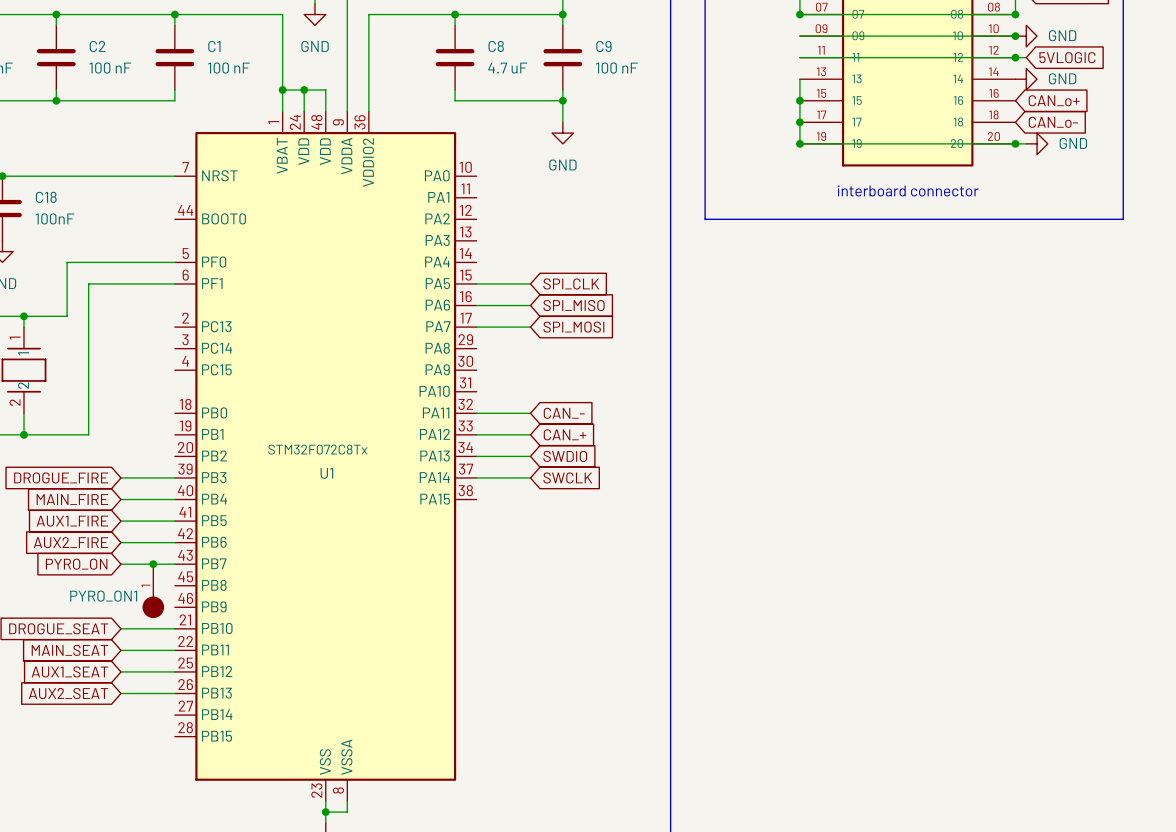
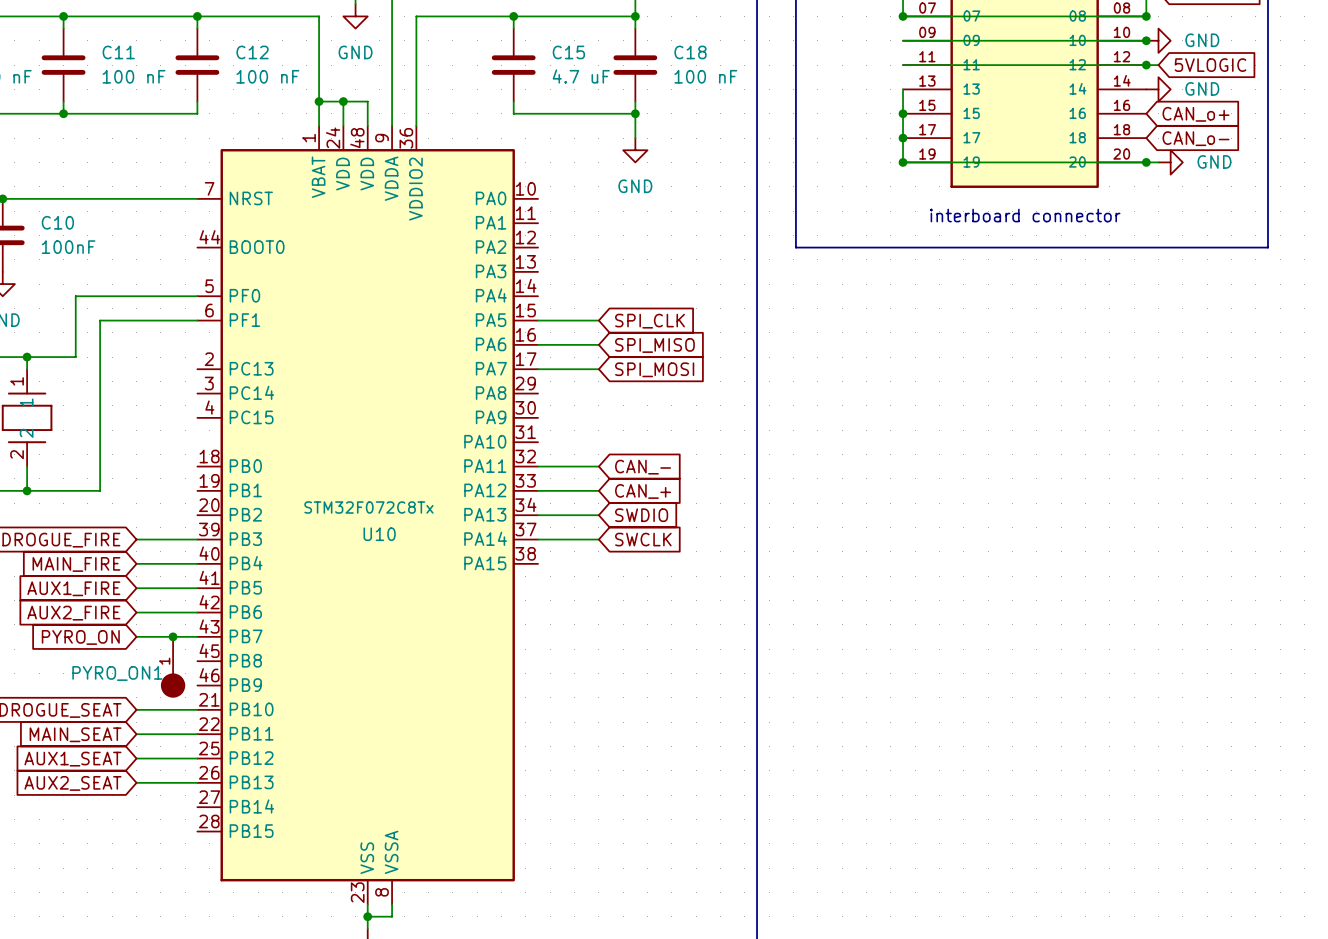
C2 name: C2 (97, 46) -> C11 (118, 52)
C1 name: C1 (214, 46) -> C12 (252, 52)
C8 name: C8 (496, 46) -> C15 (568, 52)
C9 name: C9 (603, 46) -> C18 (690, 52)
C18 name: C18 (46, 197) -> C10 (57, 222)
U1 name: U1 (326, 473) -> U10 (379, 534)

